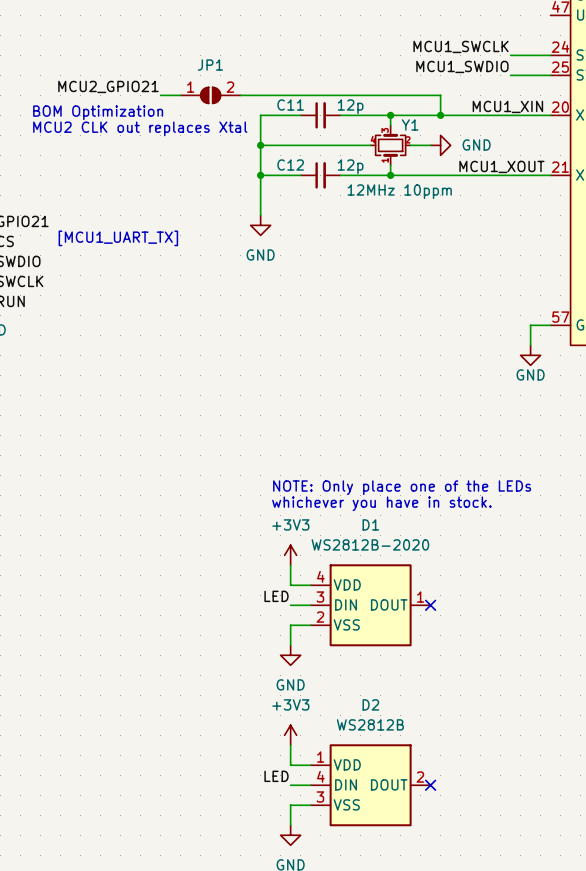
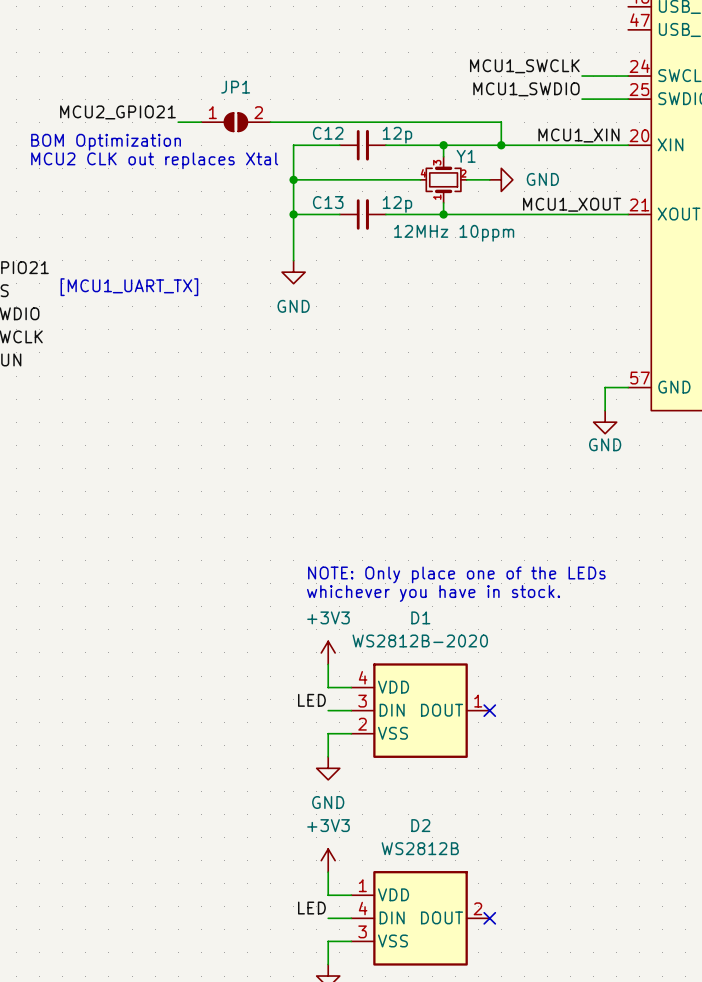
C11 name: C11 (290, 105) -> C12 (328, 133)
C12 name: C12 (290, 164) -> C13 (328, 202)

